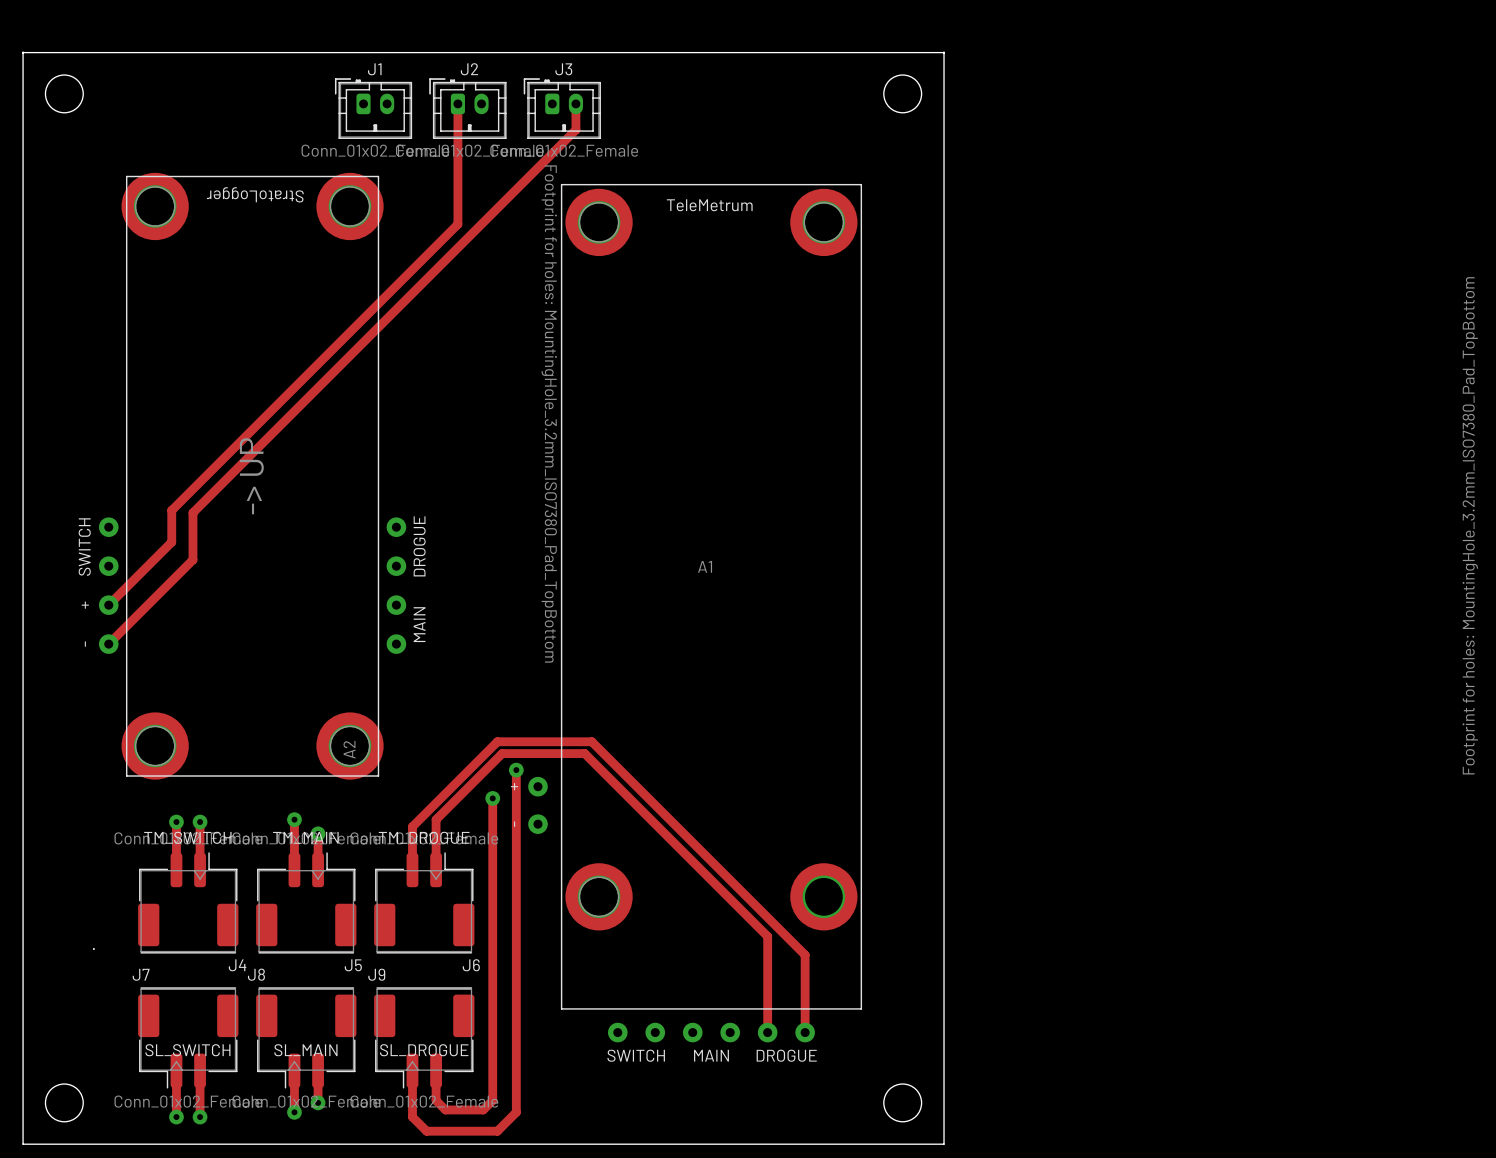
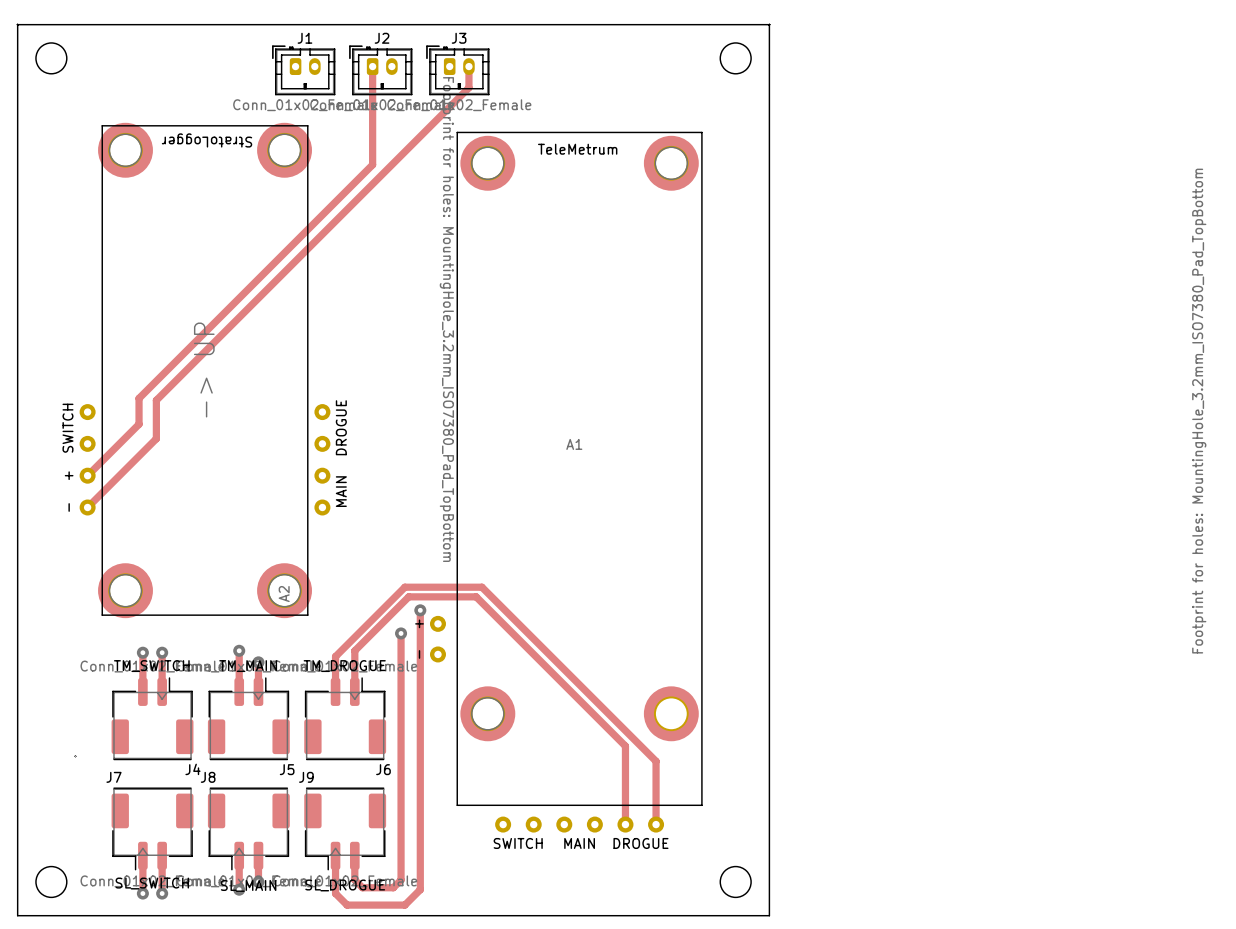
text position: SL_SWITCH (187, 1050) -> SL_SWITCH (152, 883)
text position: SL_MAIN (305, 1050) -> SL_MAIN (248, 885)
text position: SL_DROGUE (424, 1050) -> SL_DROGUE (345, 885)

